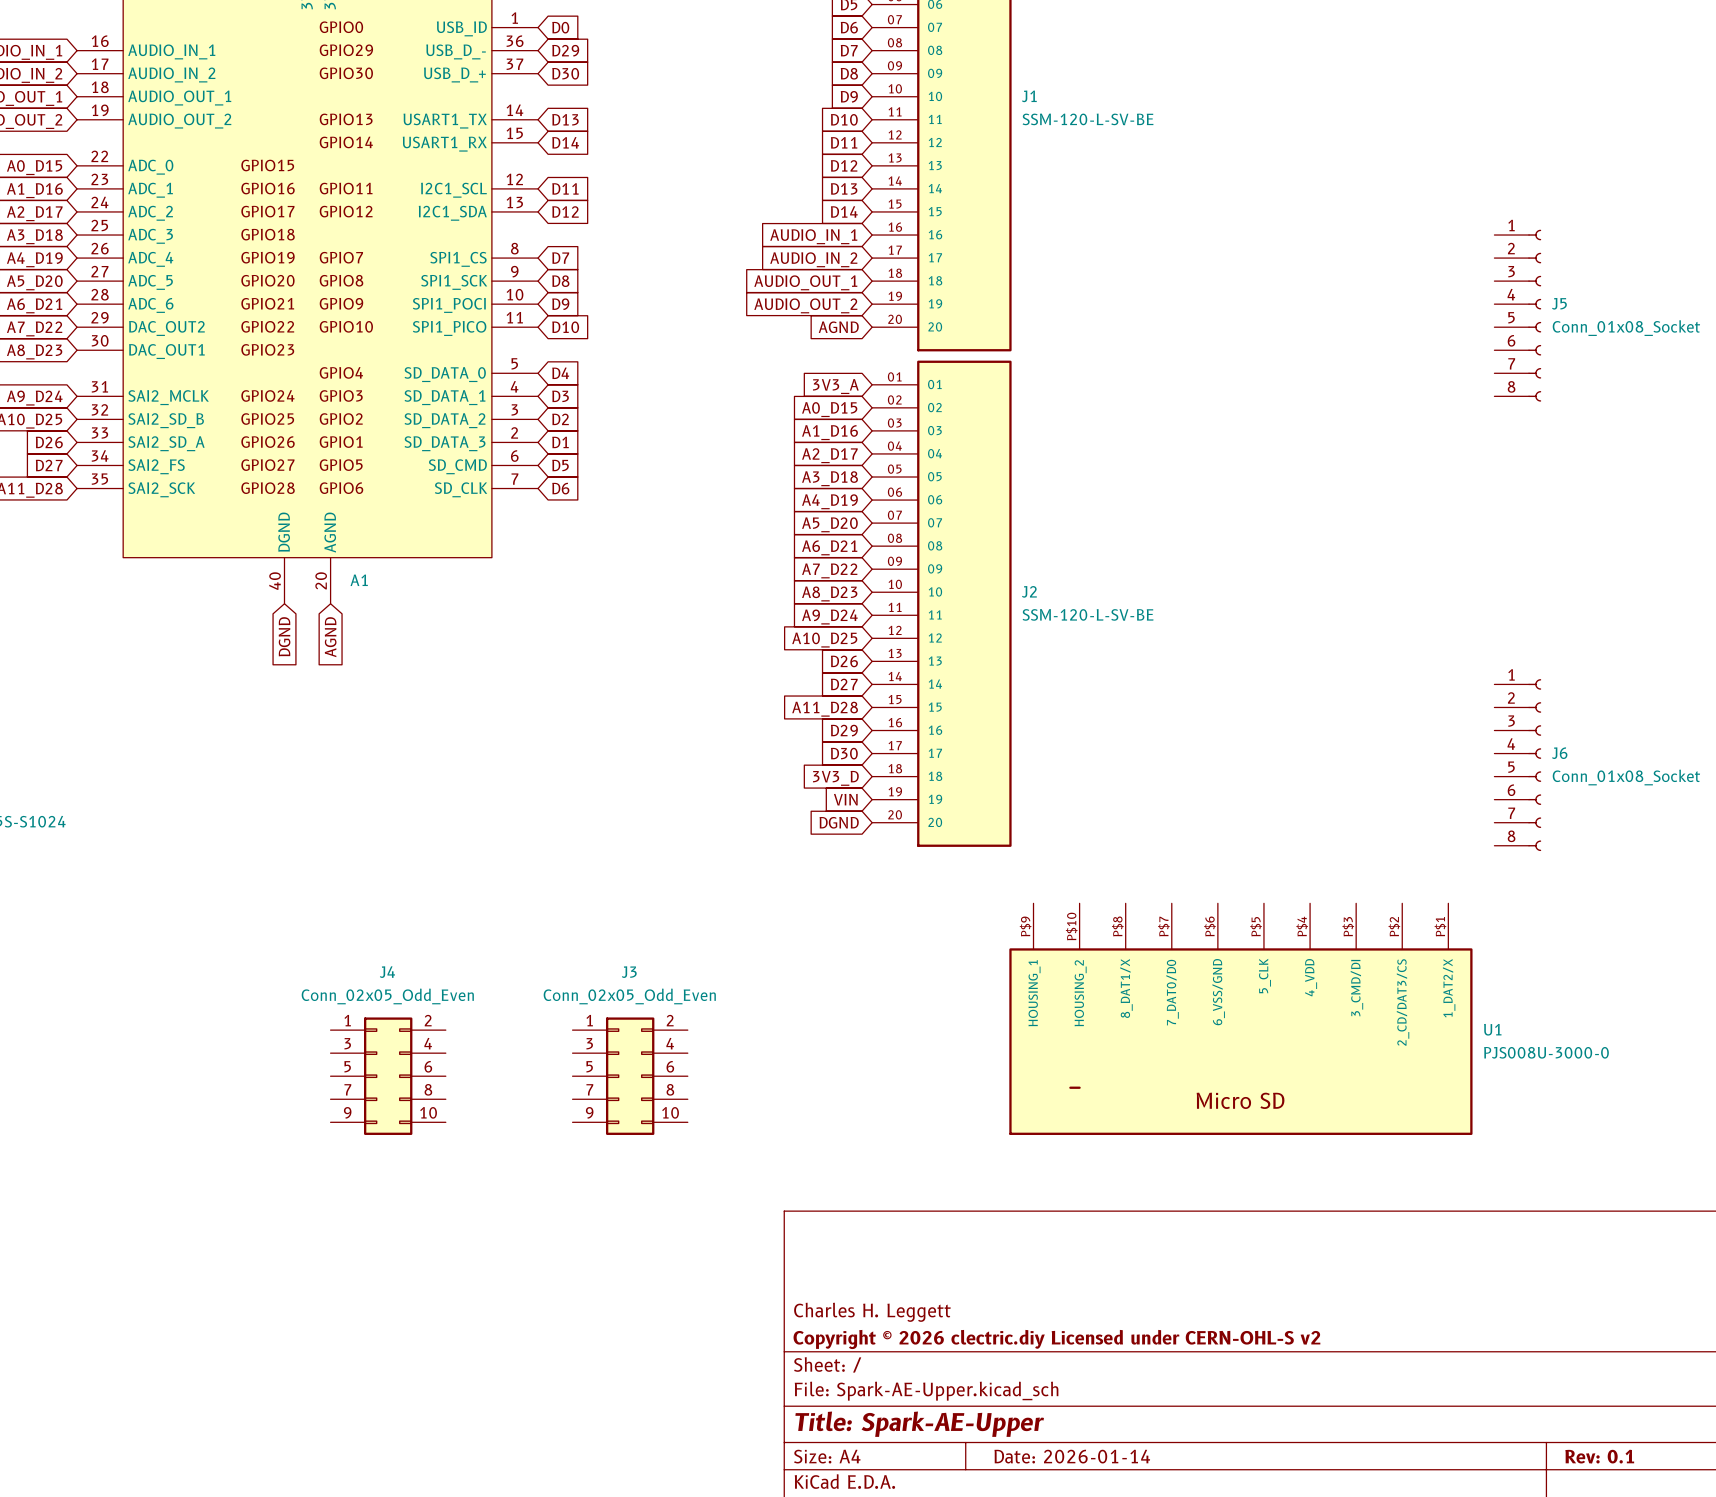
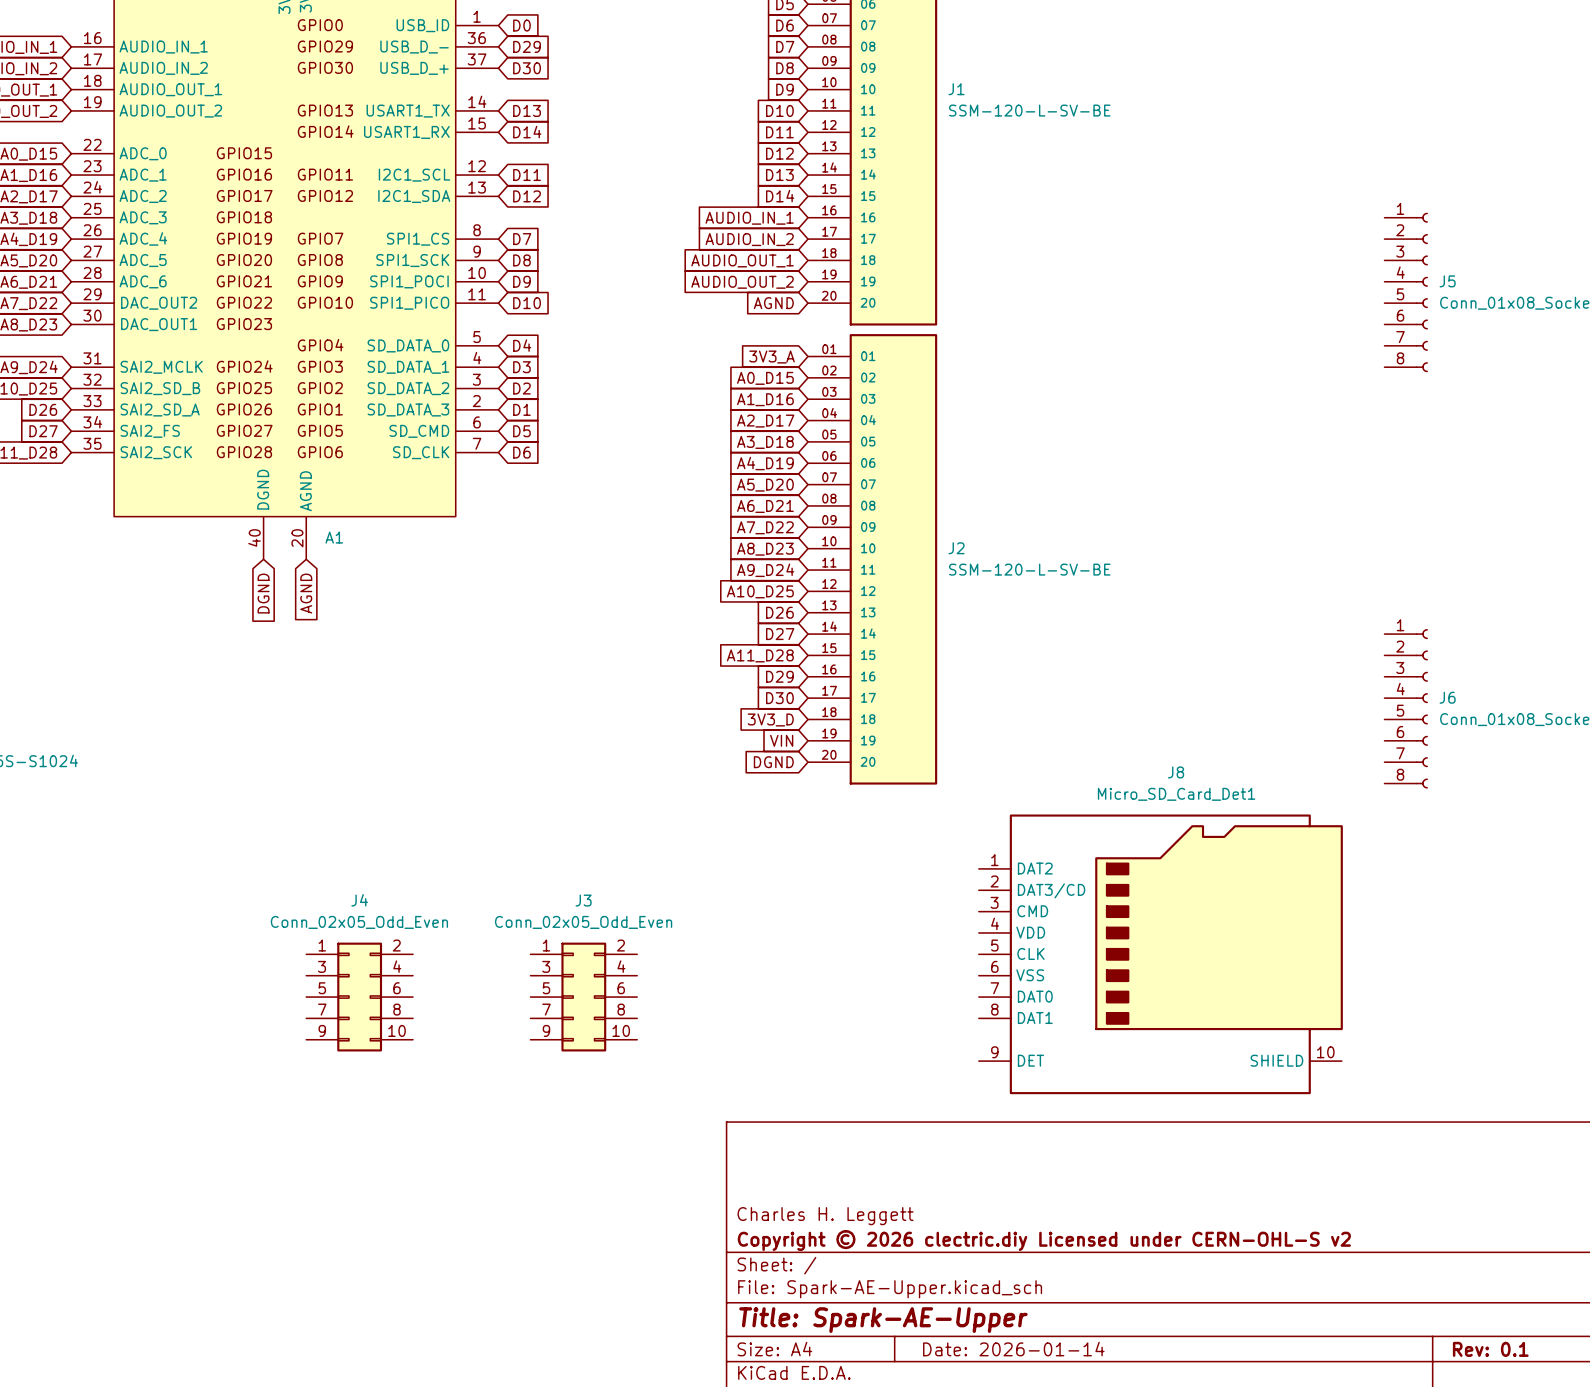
U1: PJS008U-3000-0 (1240, 1019) -> none
J8: none -> Micro_SD_Card_Det1 (1160, 954)

